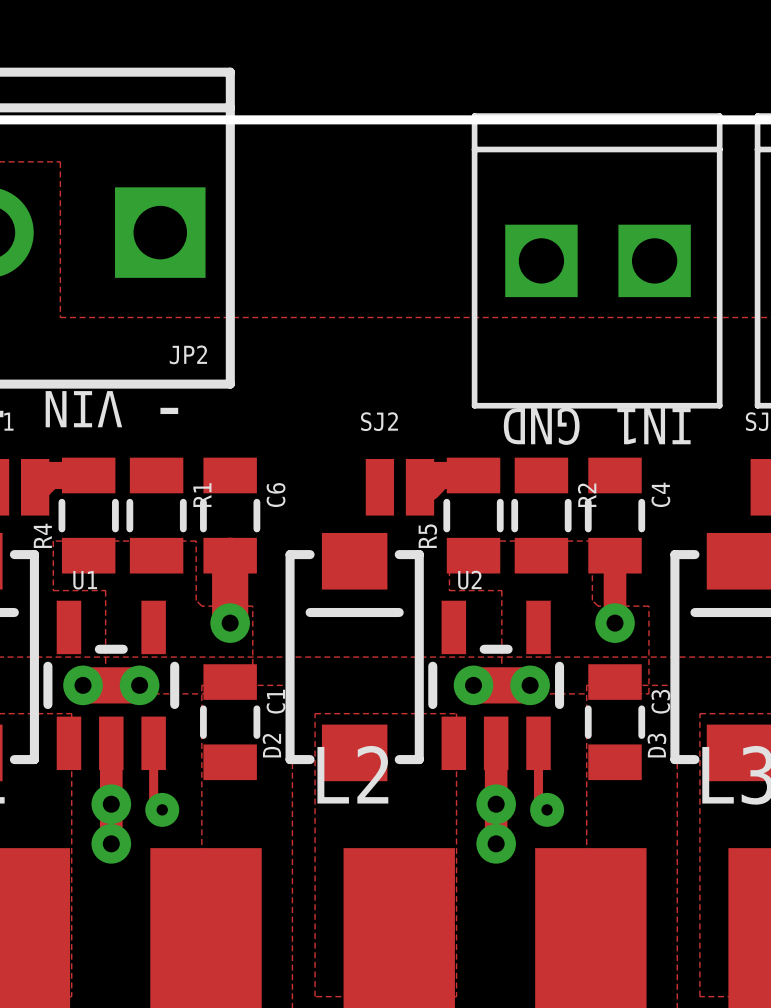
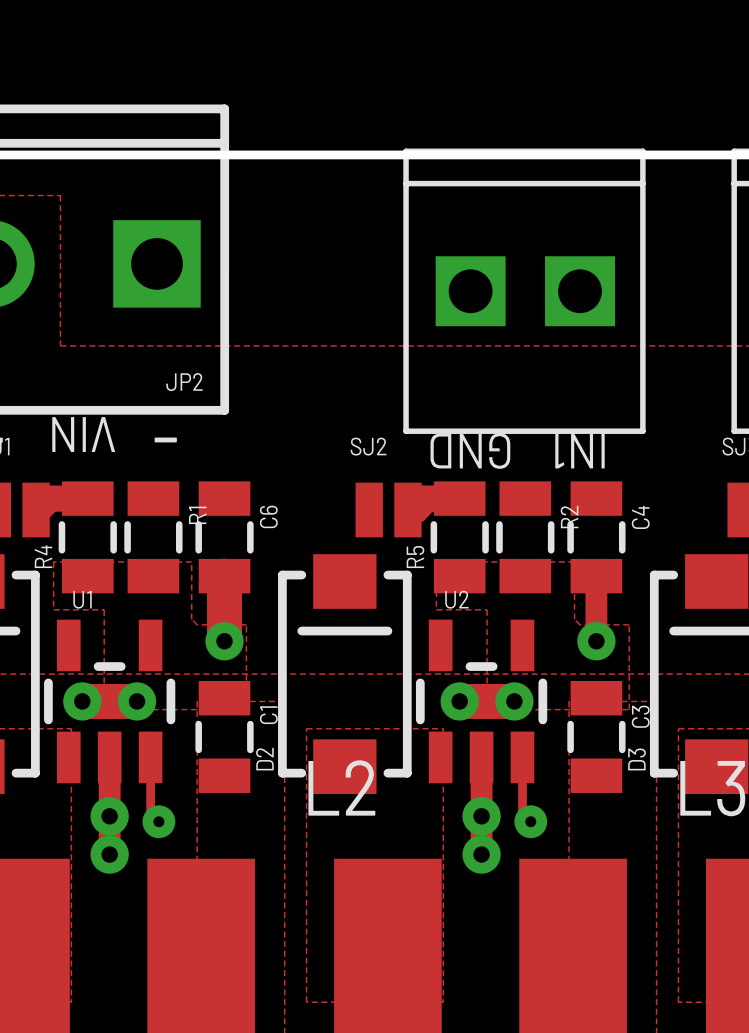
part position: (597, 260) -> (524, 291)
text position: GND (541, 426) -> GND (470, 450)
text position: IN1 (653, 426) -> IN1 (579, 450)

